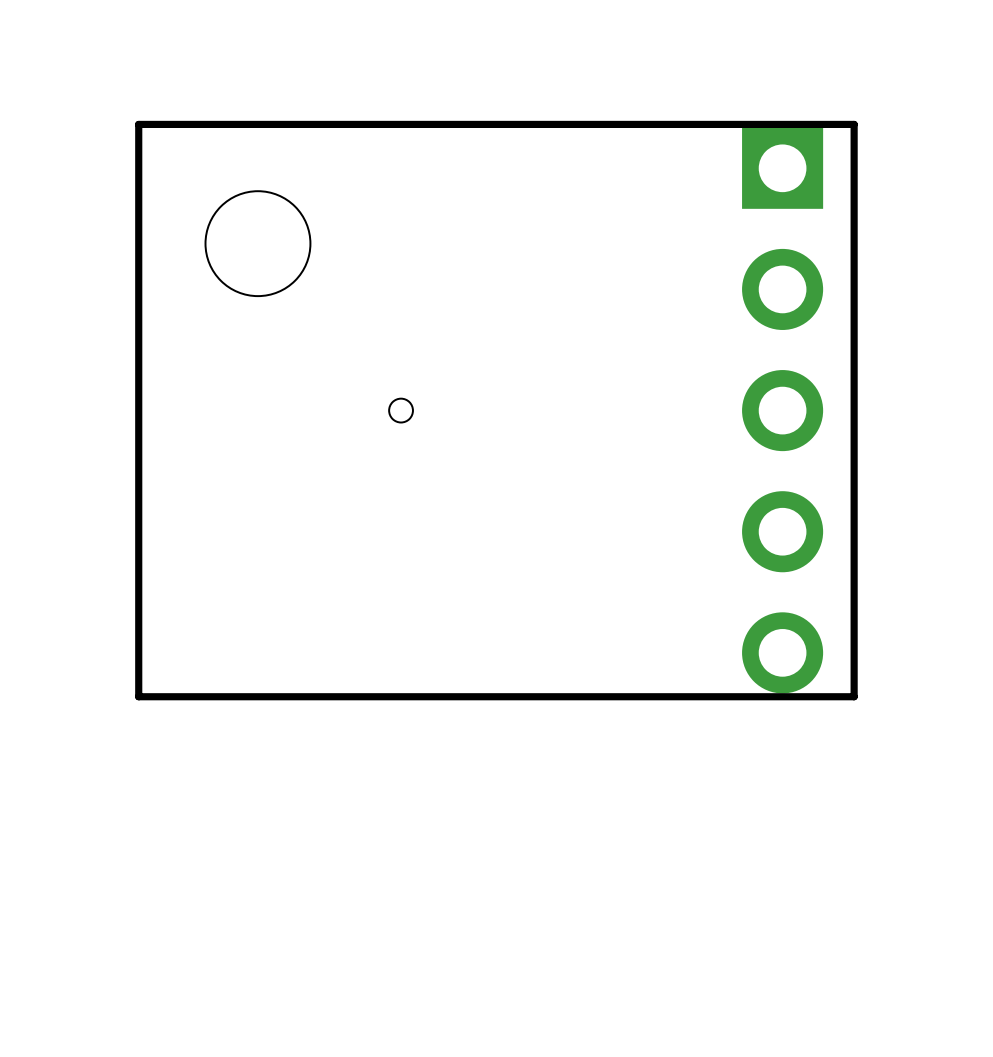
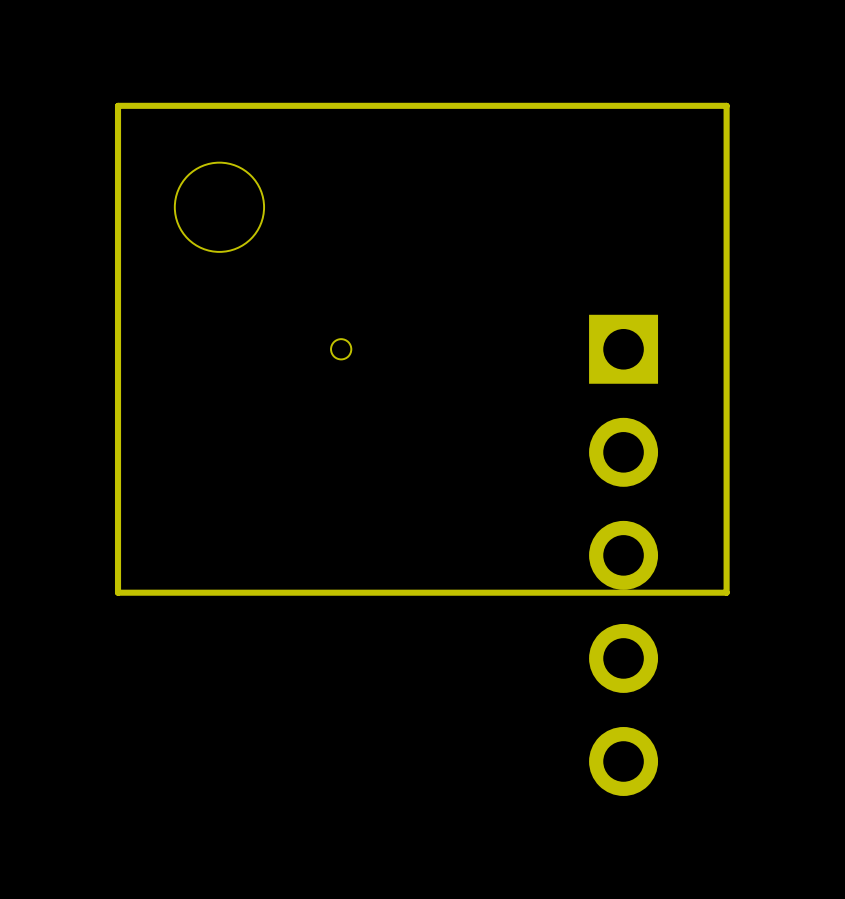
part position: (782, 410) -> (623, 555)

